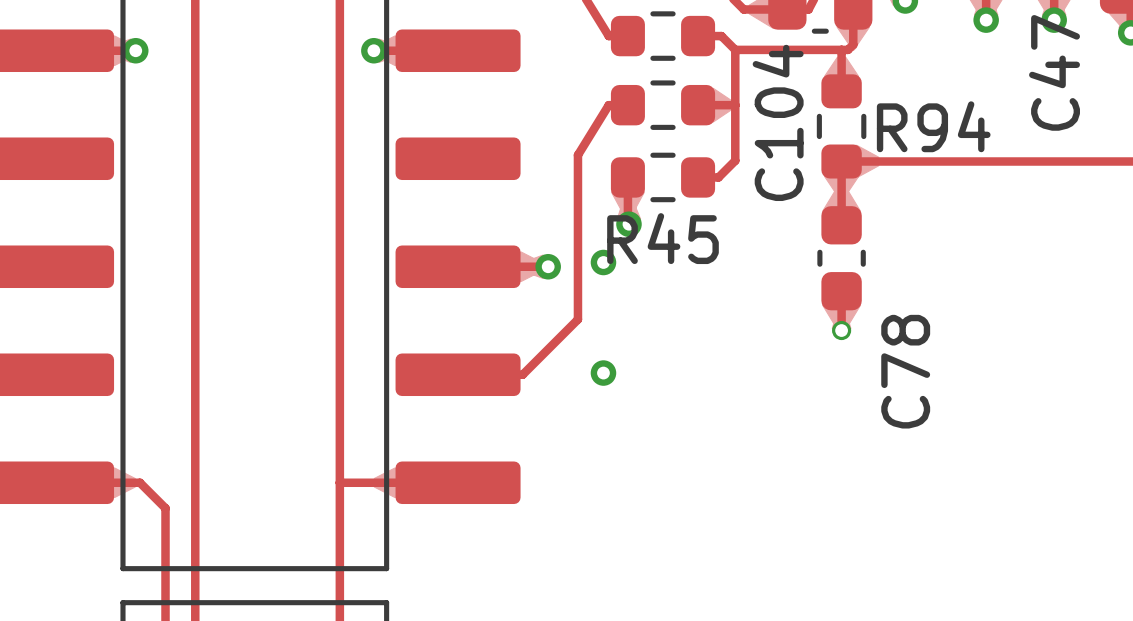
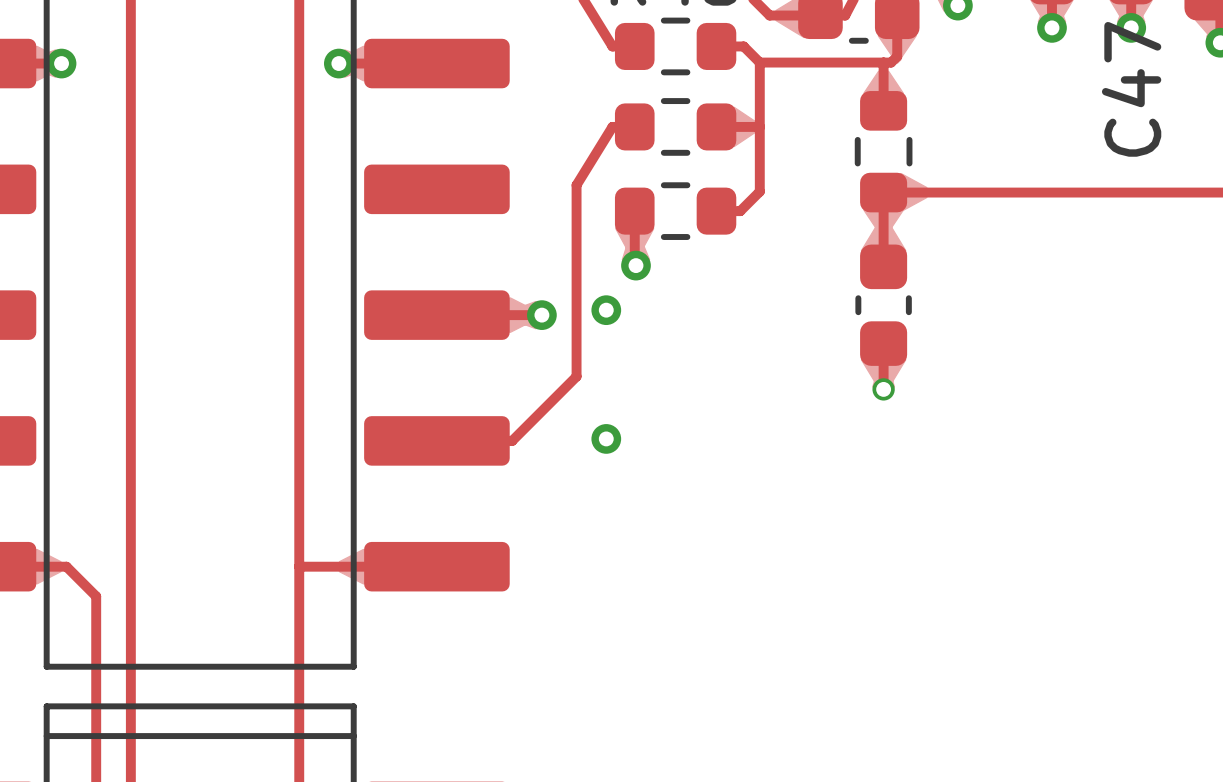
C104 name: C104 (778, 122) -> none
R94 name: R94 (933, 126) -> none
R45 name: R45 (662, 238) -> none
C78 name: C78 (905, 371) -> none

